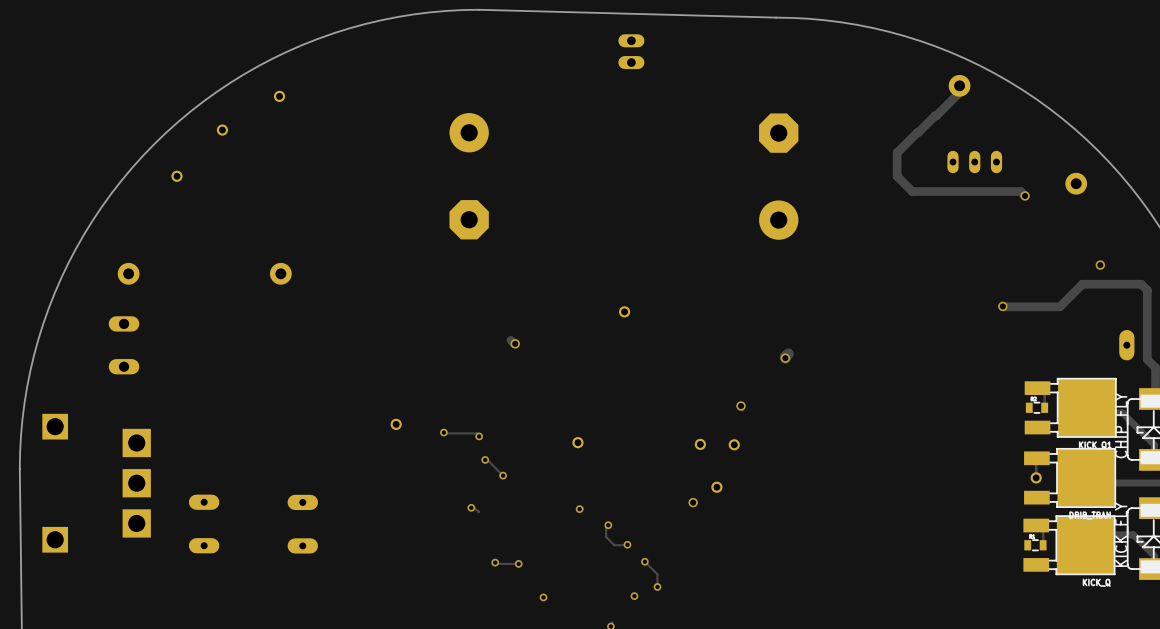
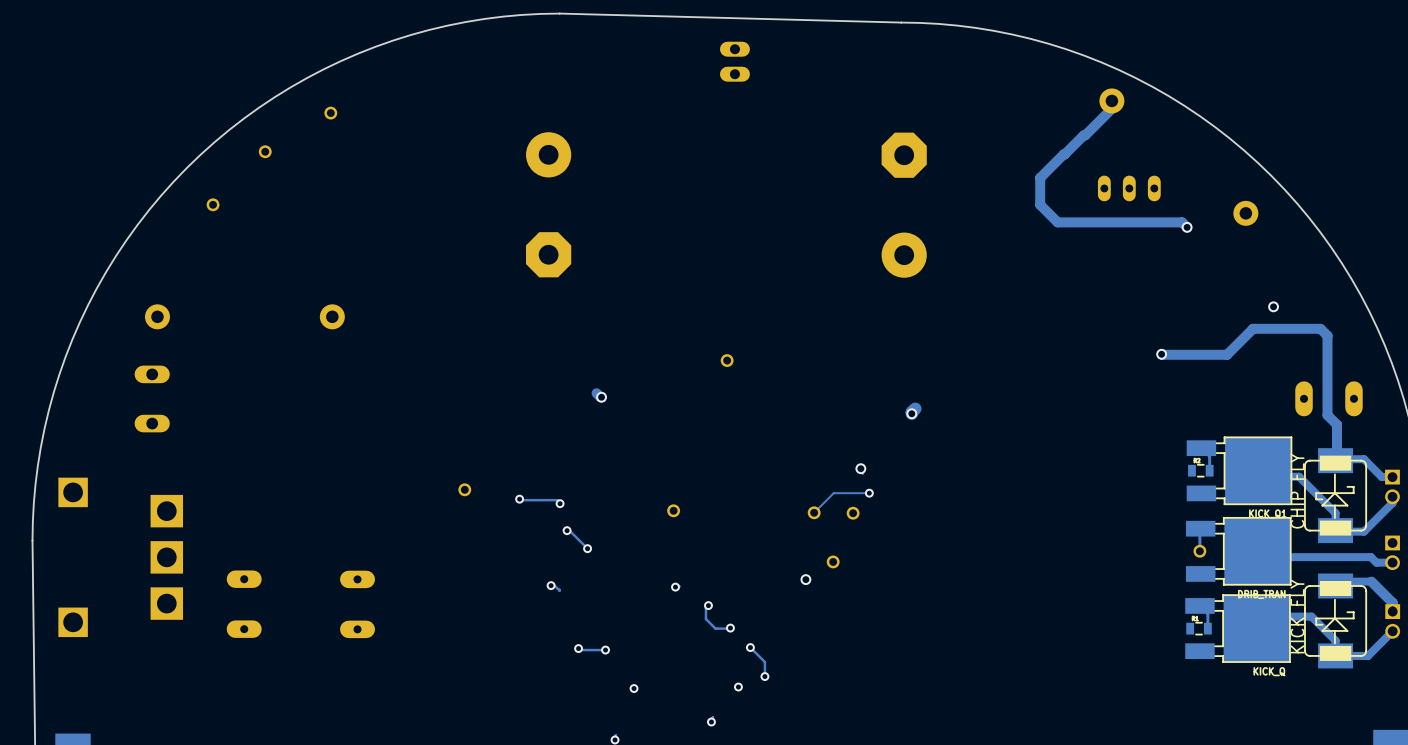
track: none -> (869, 493) (833, 493) (814, 512)
via: none -> (869, 493)

